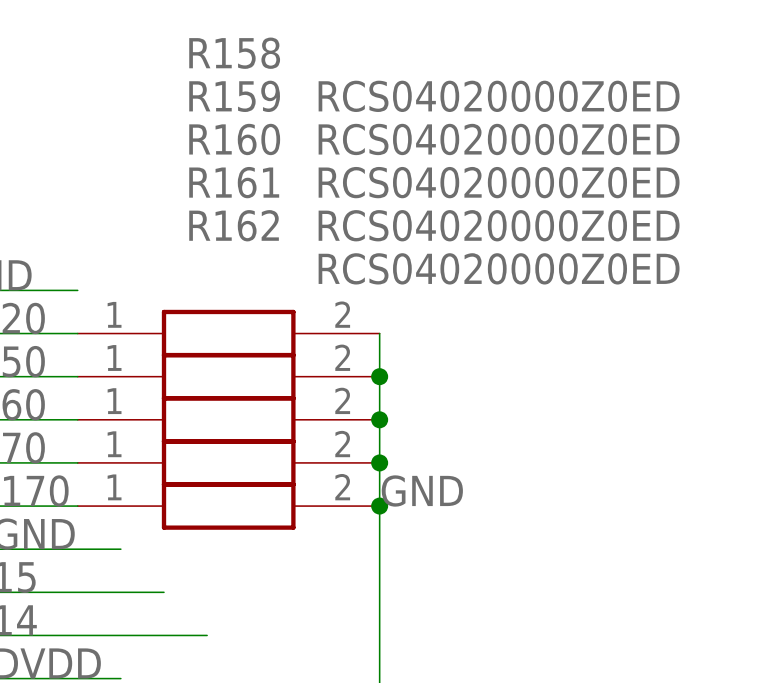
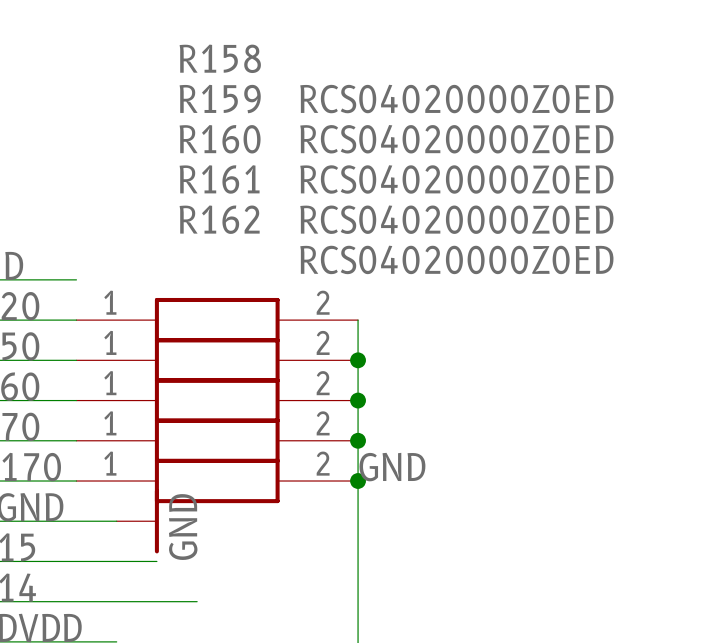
power symbol: none -> GND (137, 521)

